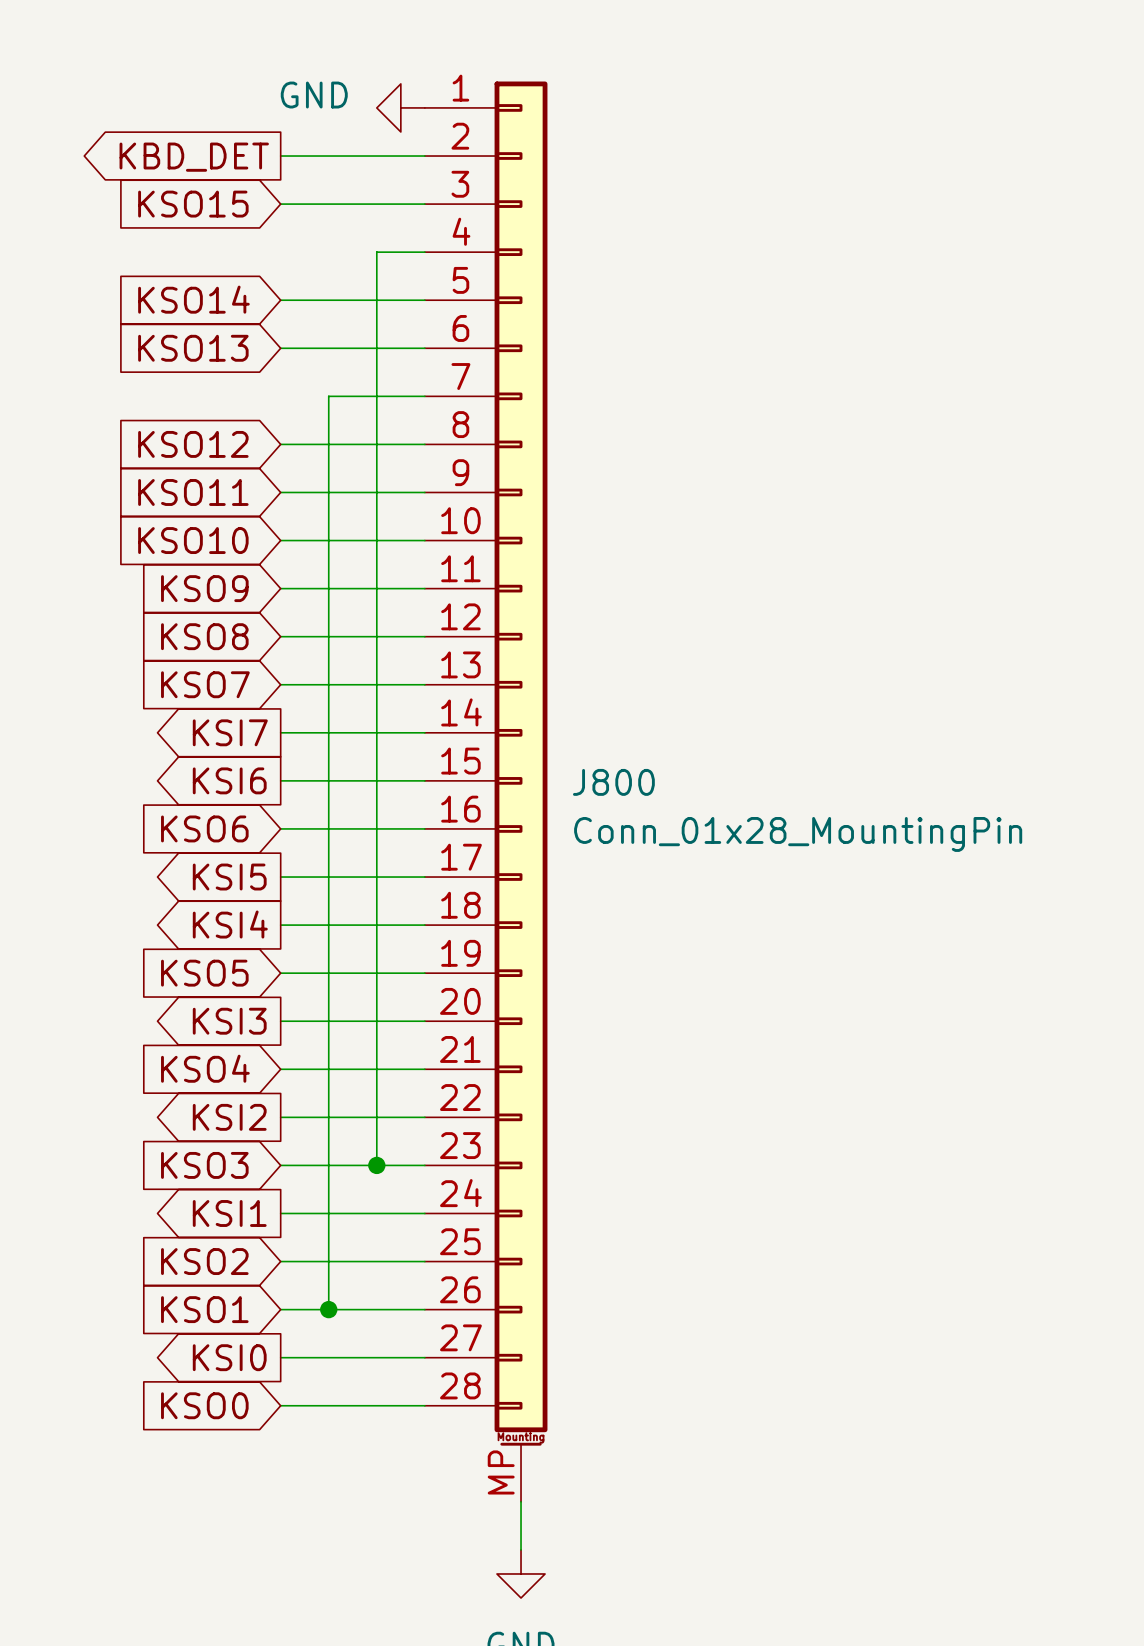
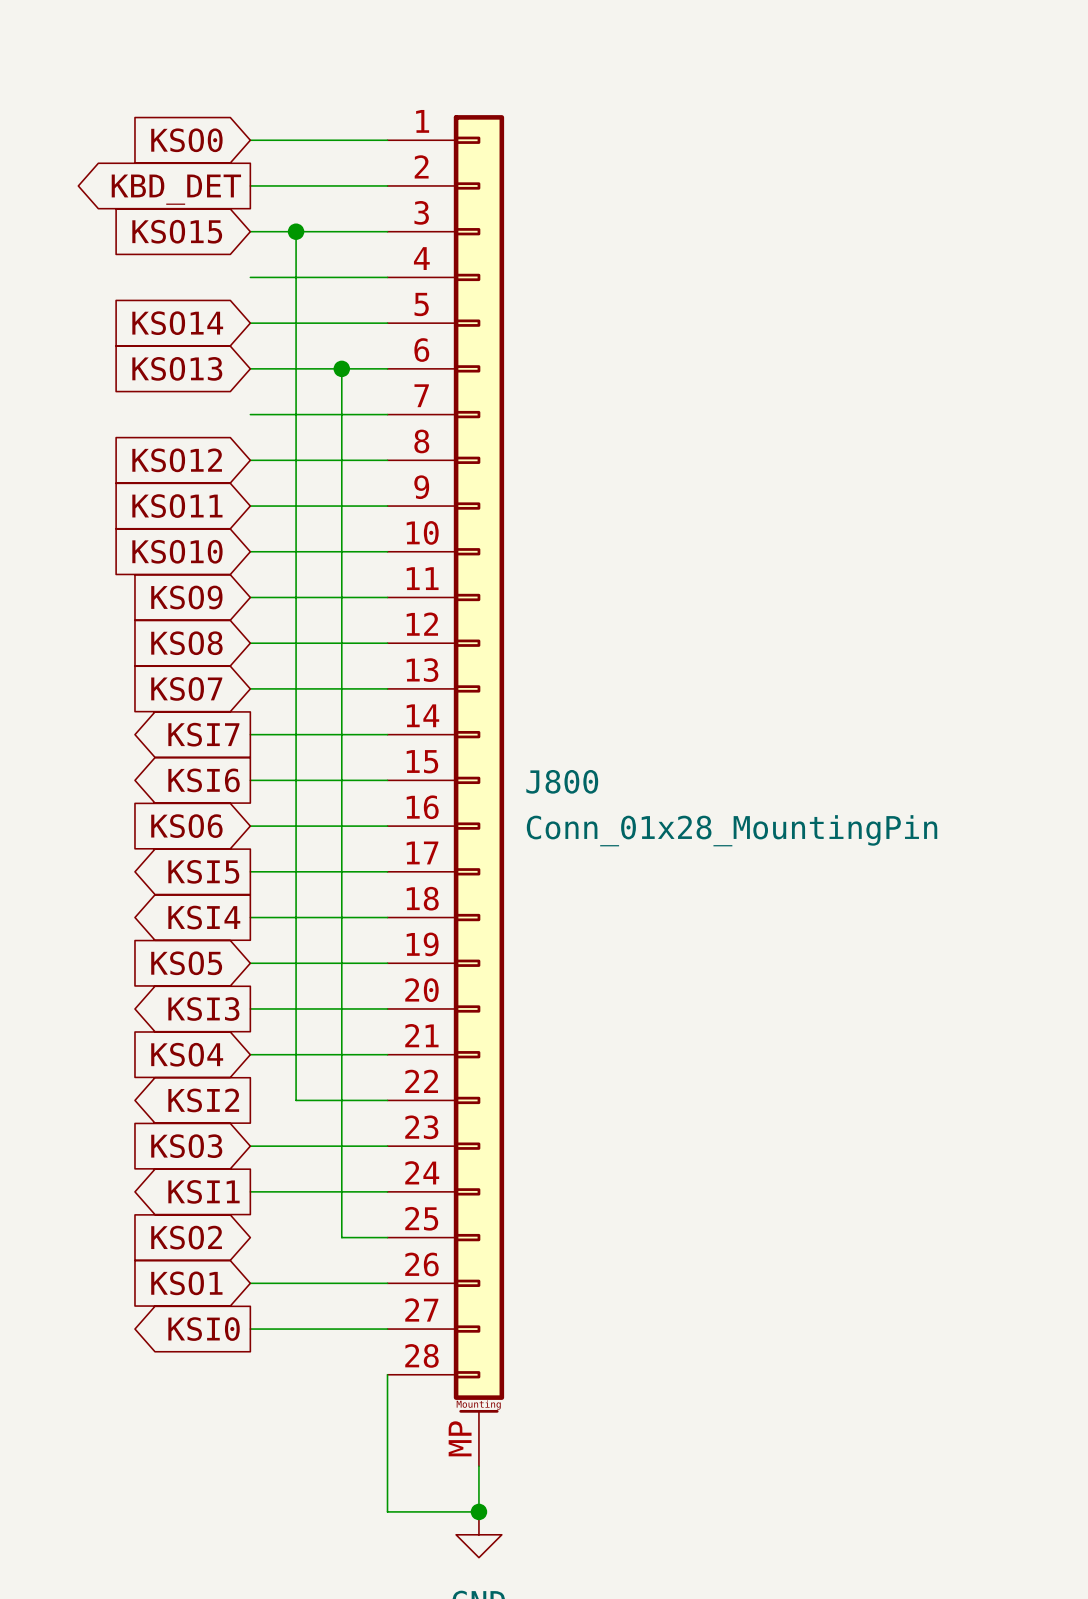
global label: none -> KSO0 (186, 140)
wire: none -> (250, 140) (387, 140)
power symbol: GND (400, 107) -> none
wire: none -> (296, 231) (296, 414) (250, 414)
junction: none -> (296, 231)
wire: (376, 252) (376, 348) -> (341, 277) (250, 277)
junction: none -> (341, 368)
wire: (280, 1117) (328, 1117) (328, 1309) -> none
junction: (376, 1165) -> none
wire: (280, 1261) (376, 1261) -> (341, 1146) (341, 1237)
junction: (328, 1309) -> none
global label: KSO0 (204, 1405) -> none
wire: (280, 1405) (424, 1405) -> (478, 1511) (387, 1511) (387, 1374)
junction: none -> (478, 1511)

